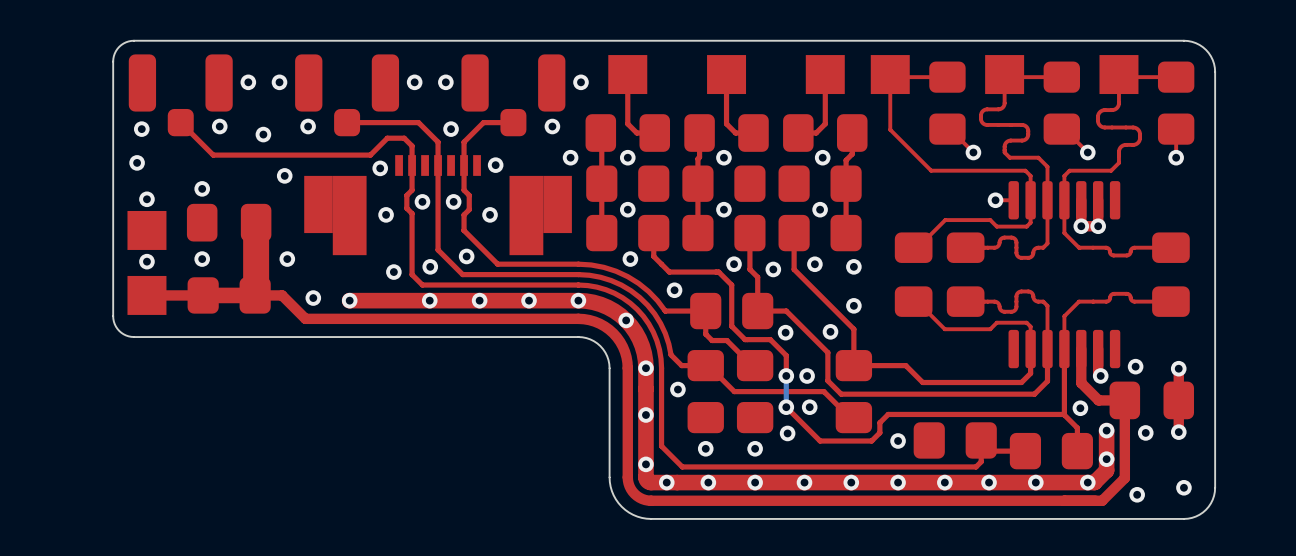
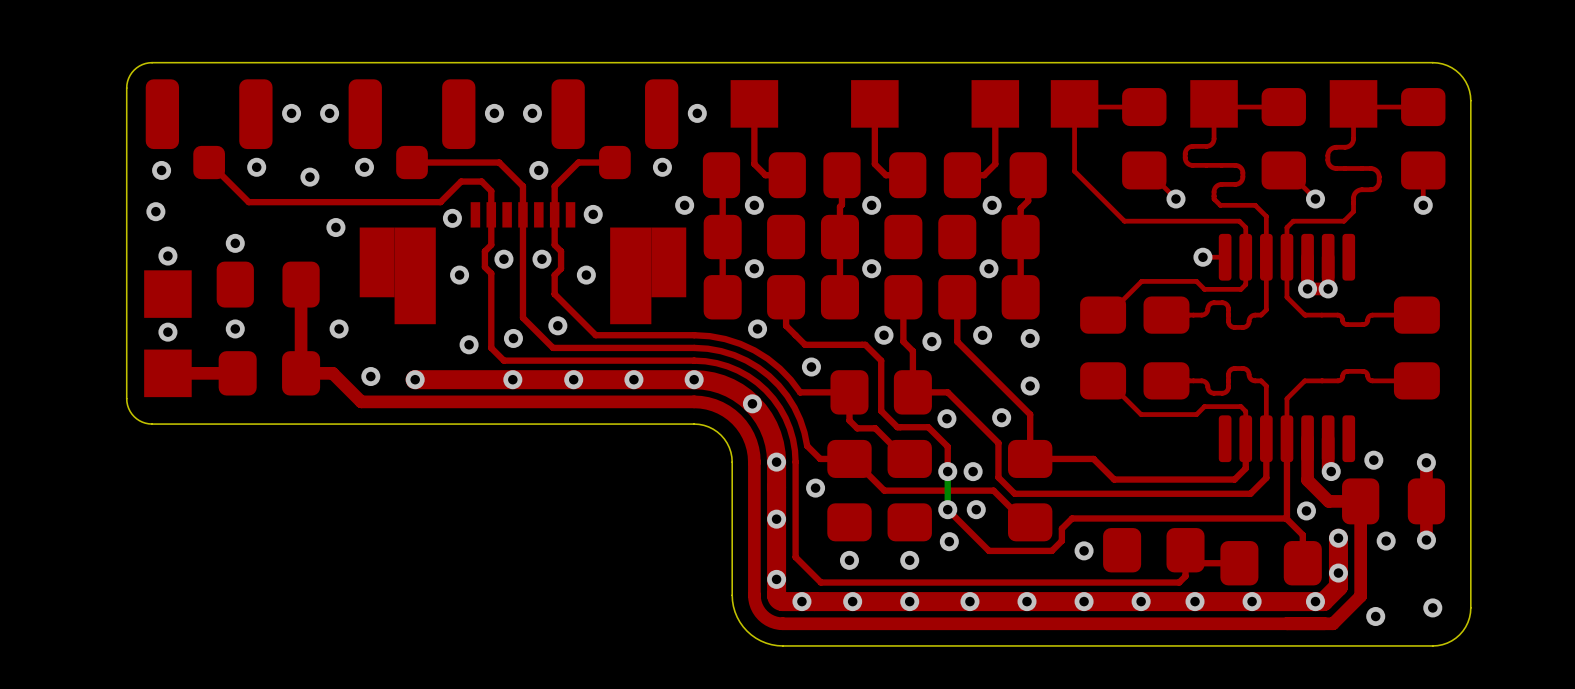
top track width: thick (256, 222) (256, 295) -> thin (301, 284) (301, 373)
part footprint: [187, 277, 271, 314] -> [218, 351, 321, 396]

